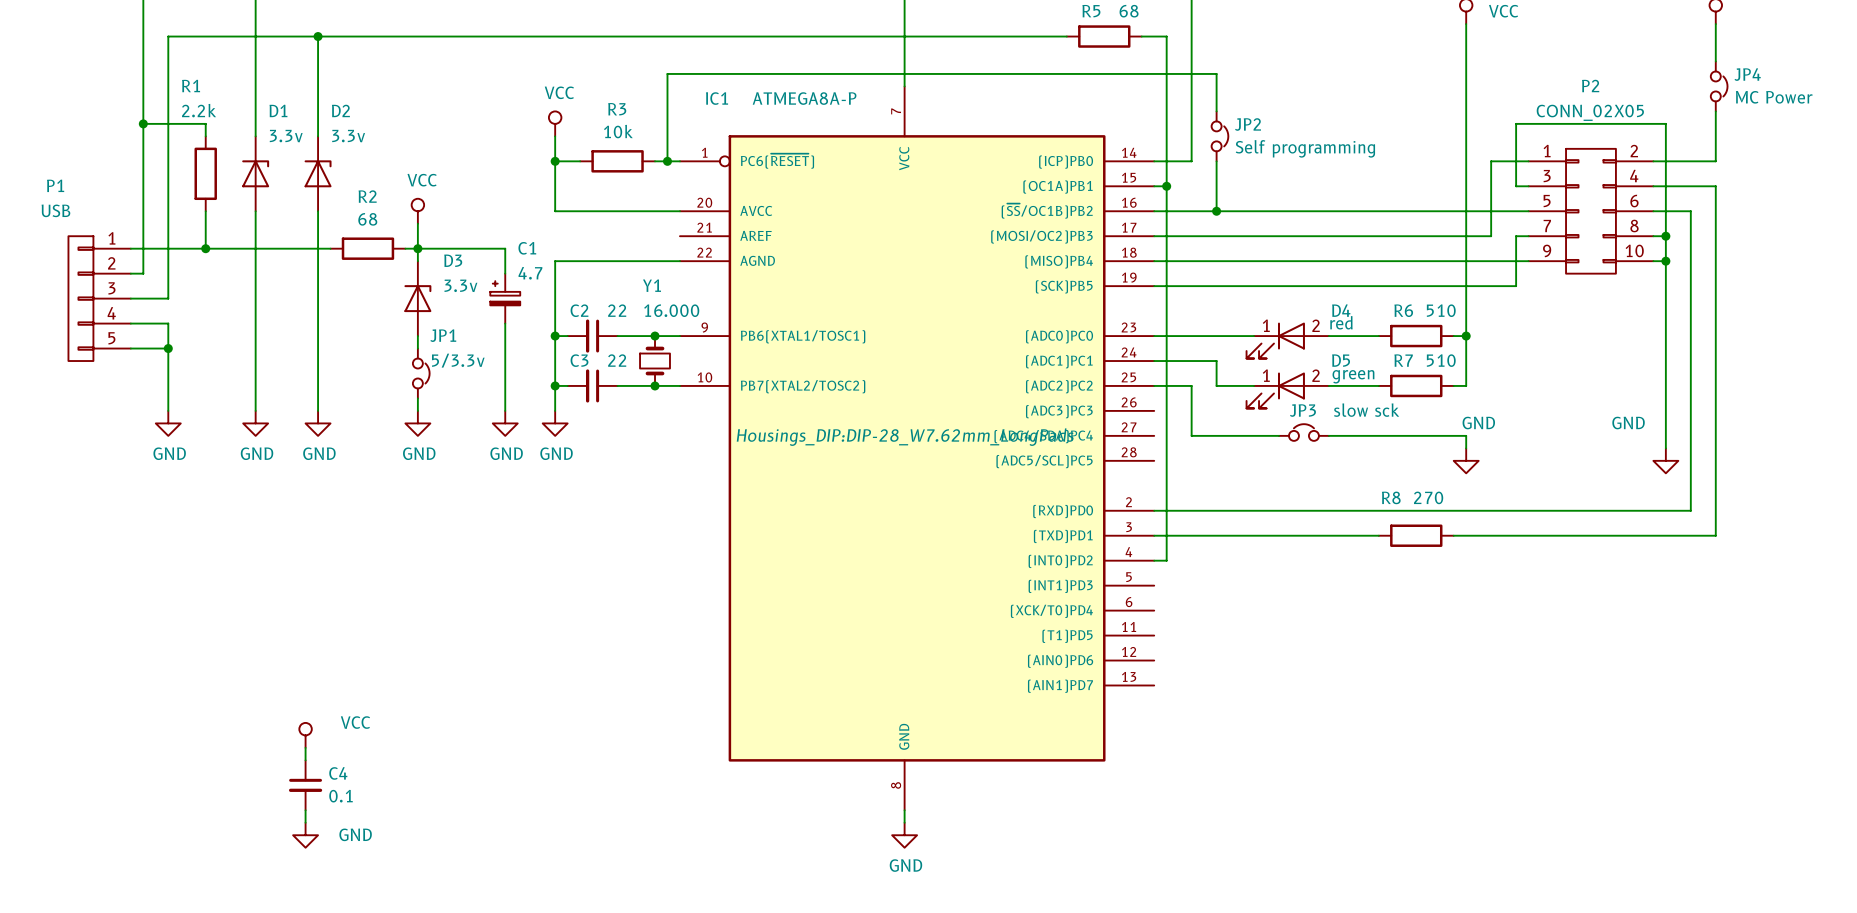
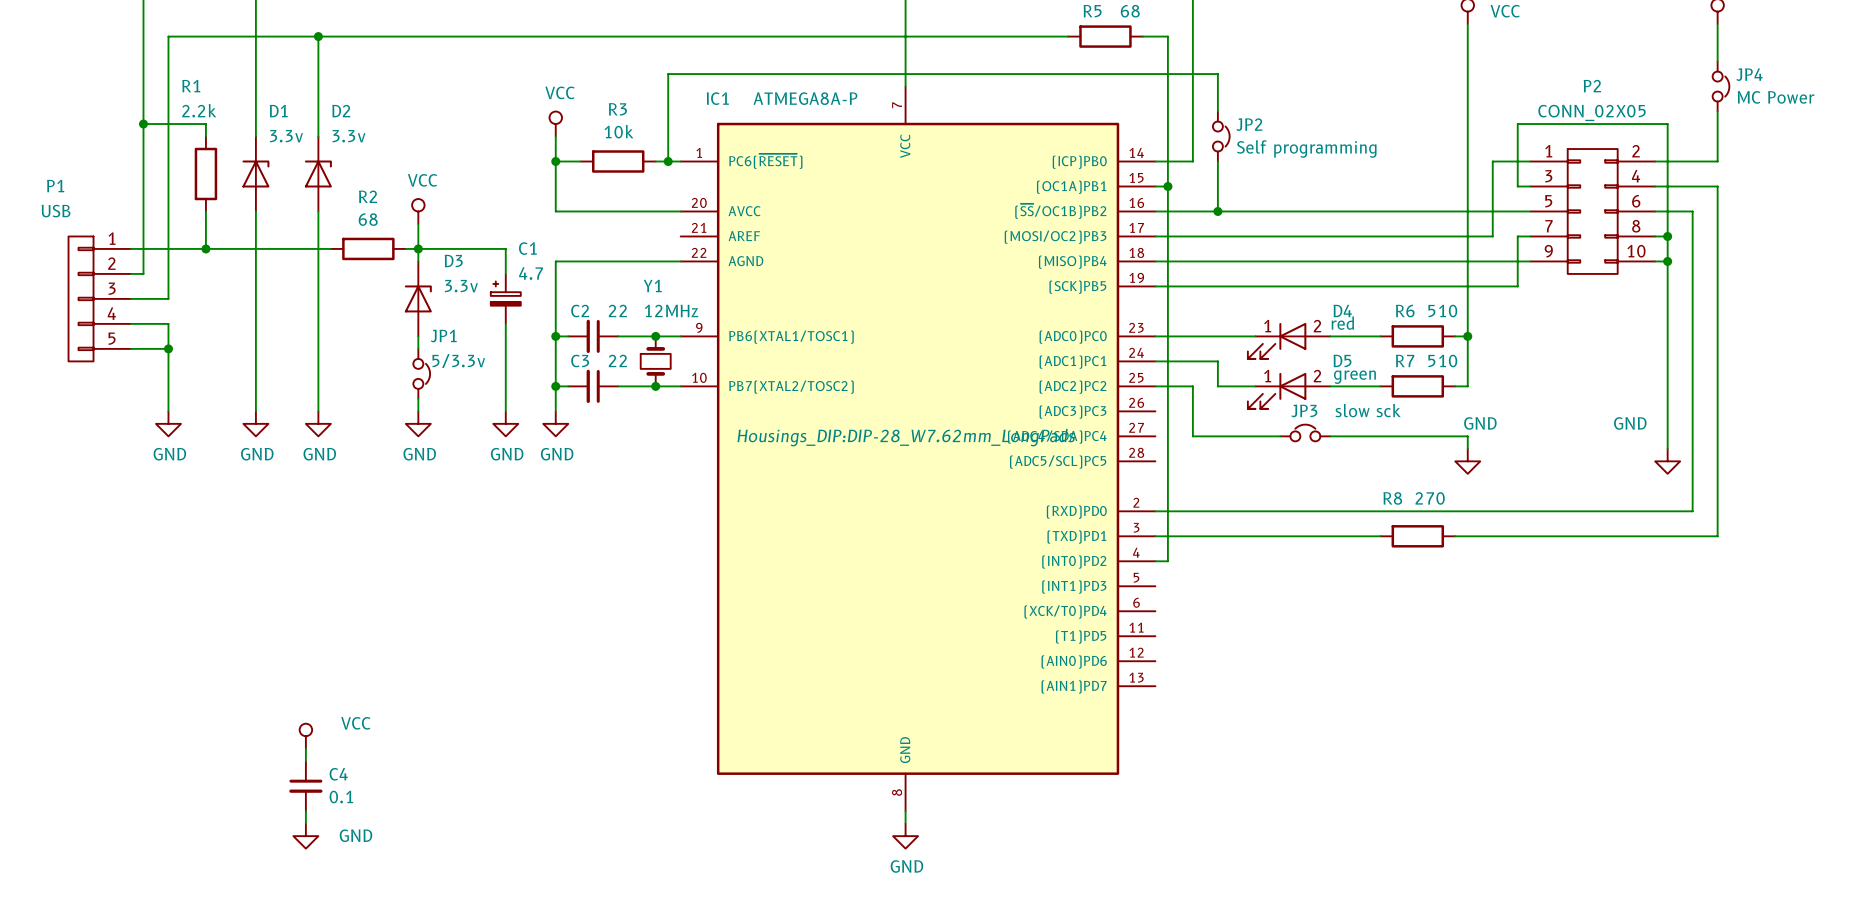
IC1 symbol: [679, 86, 1155, 811] -> [680, 86, 1156, 812]
Y1 value: 16.000 (671, 310) -> 12MHz (671, 310)

